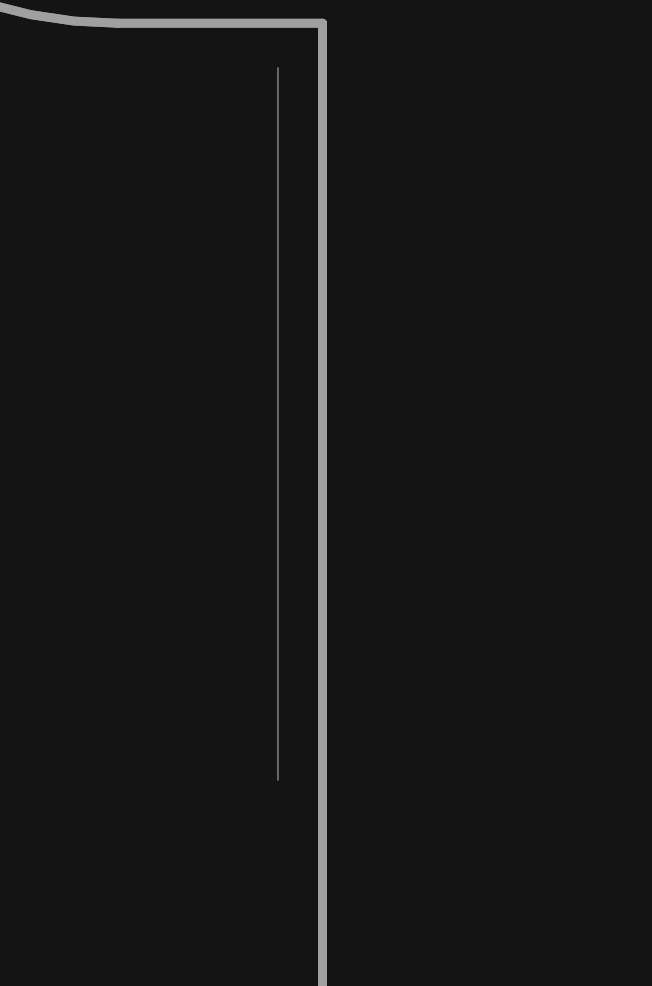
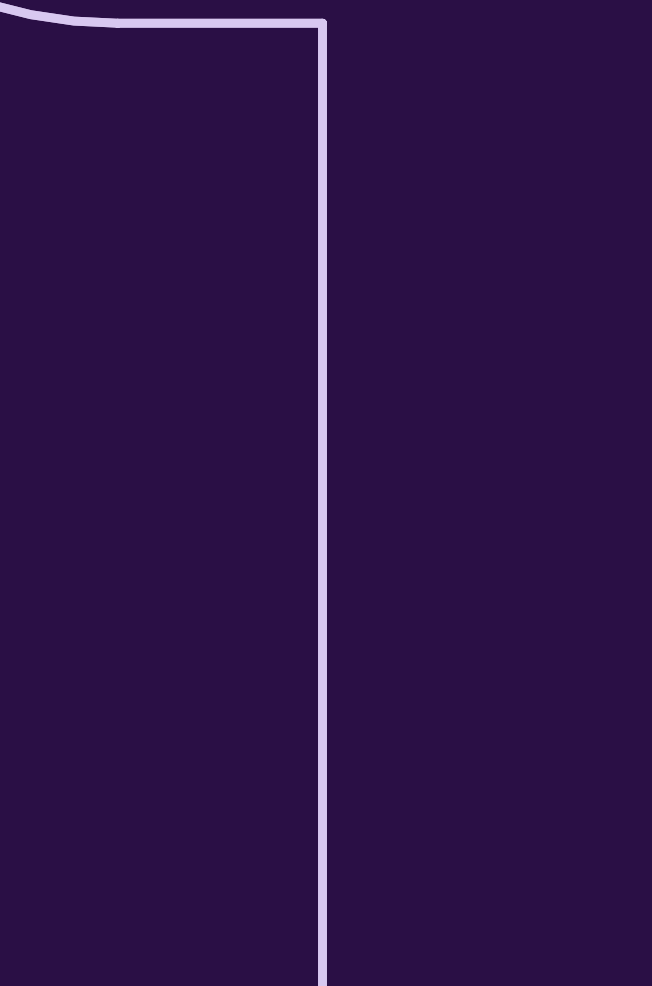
part: (277, 423) -> none

